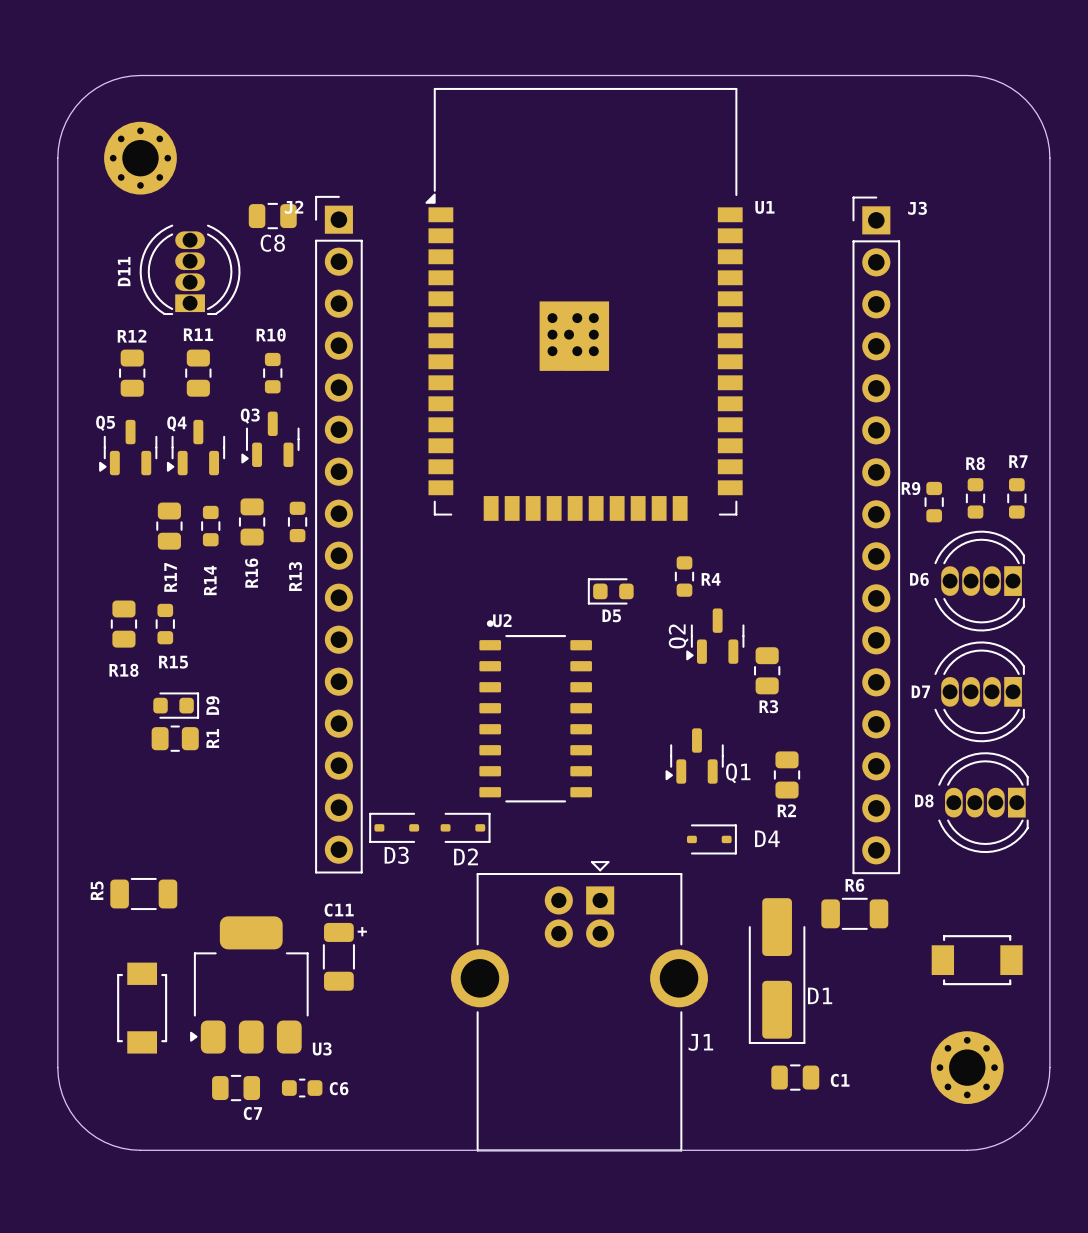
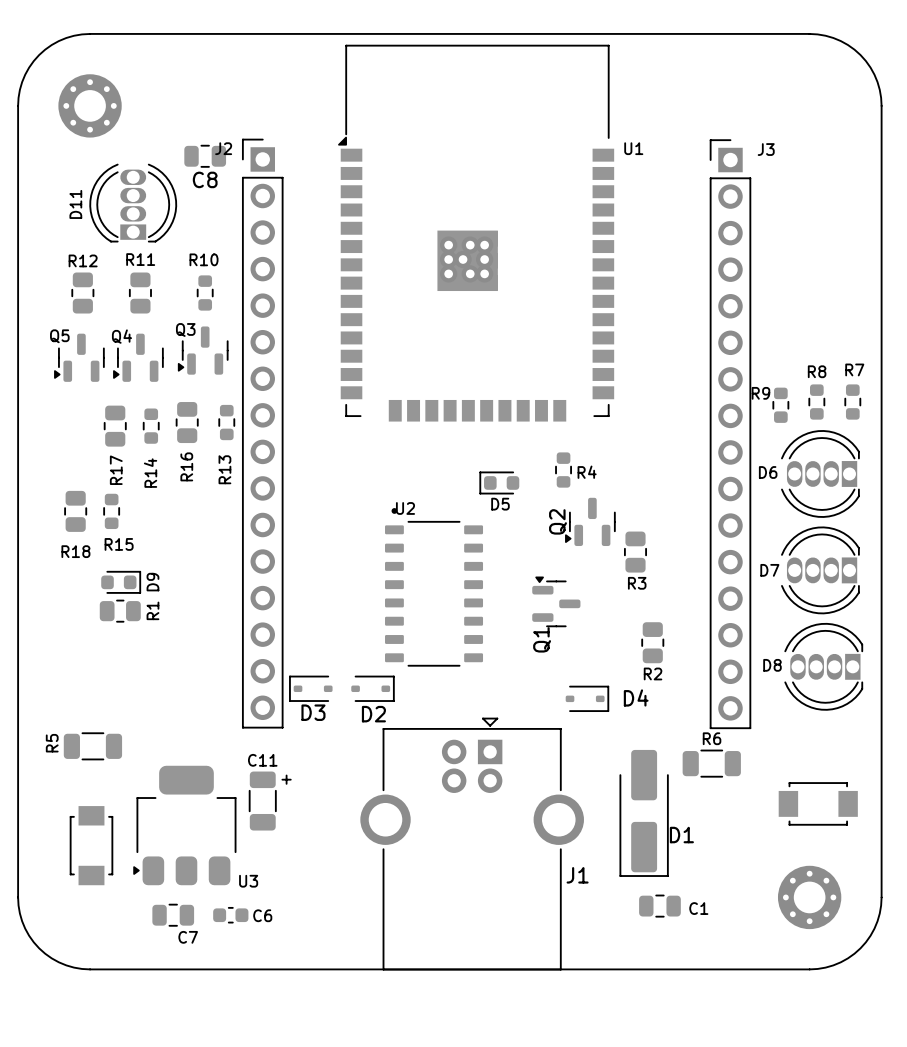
Q1 rotation: 0° (694, 756) -> 90° clockwise (556, 601)

